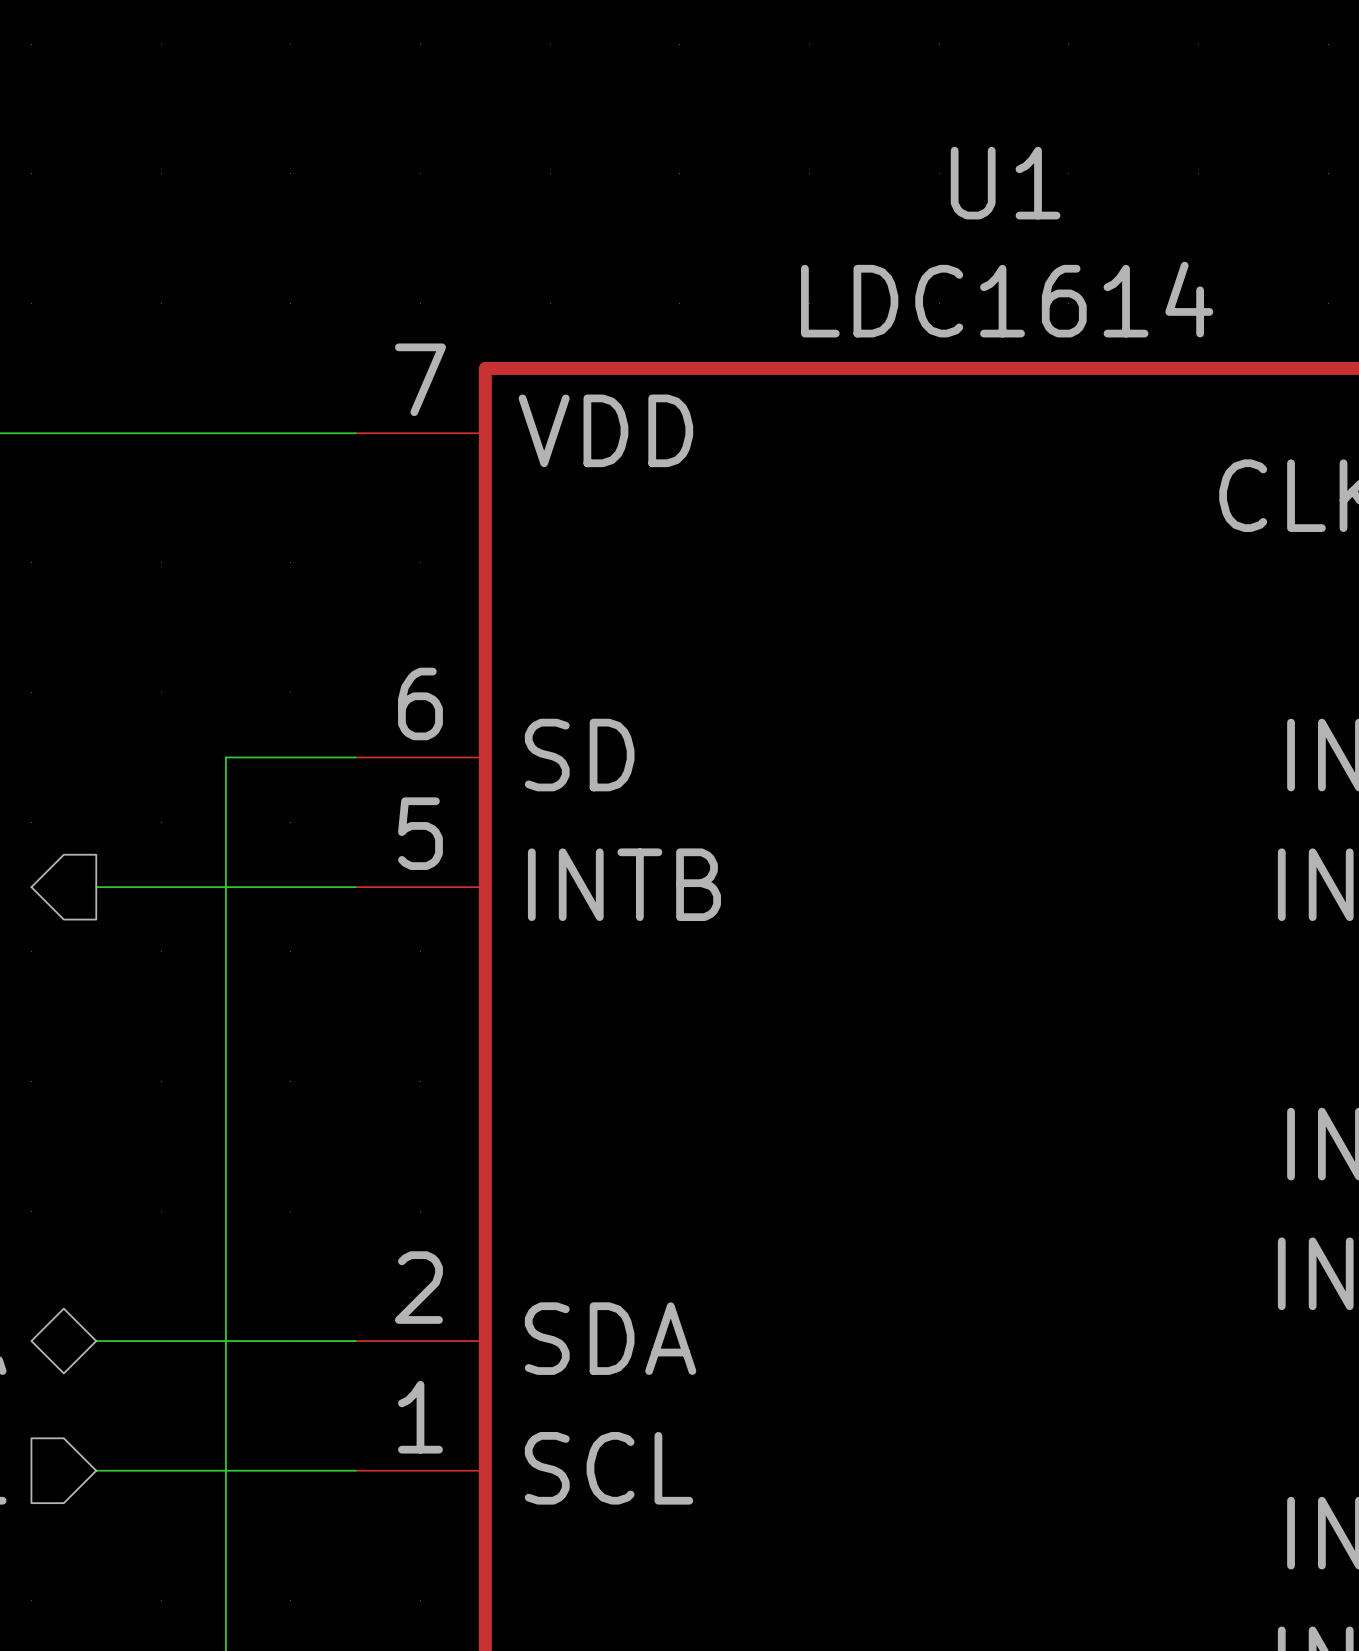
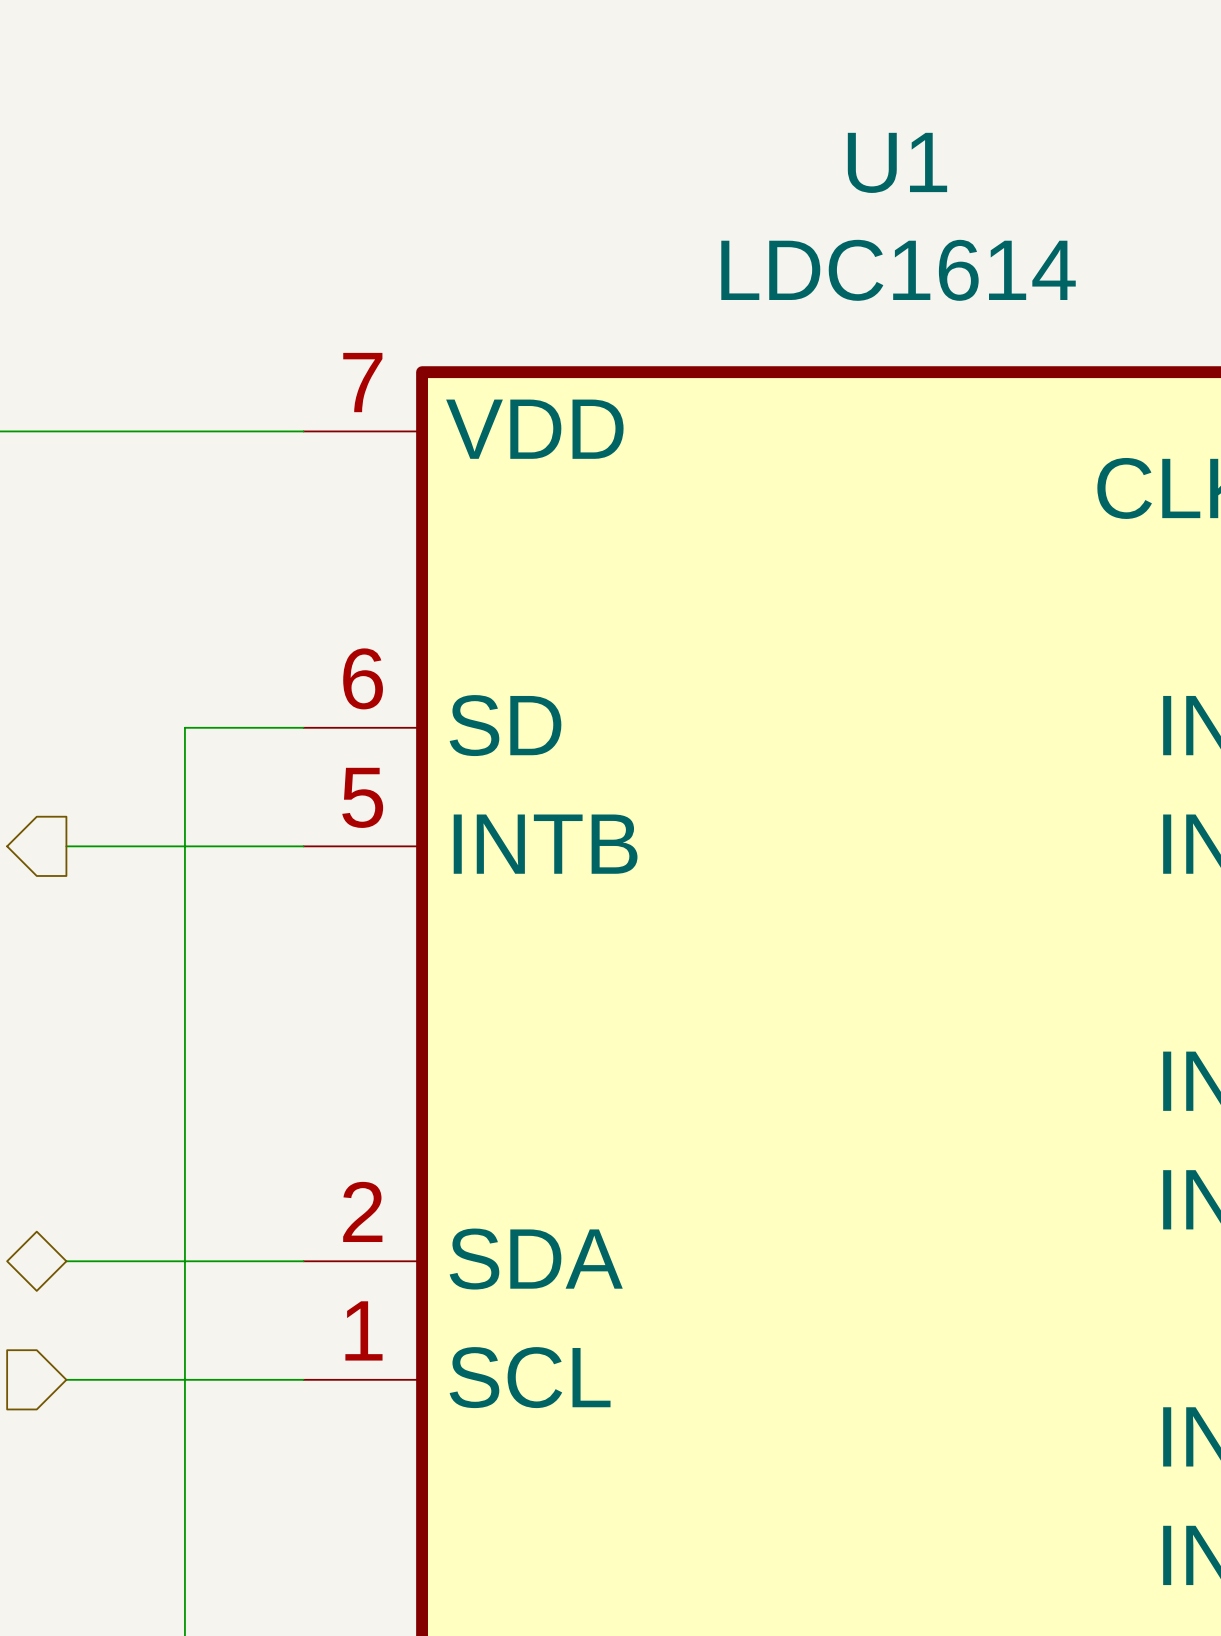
U1 name position: U1 (1005, 183) -> U1 (897, 162)
U1 value position: LDC1614 (1007, 299) -> LDC1614 (898, 270)

